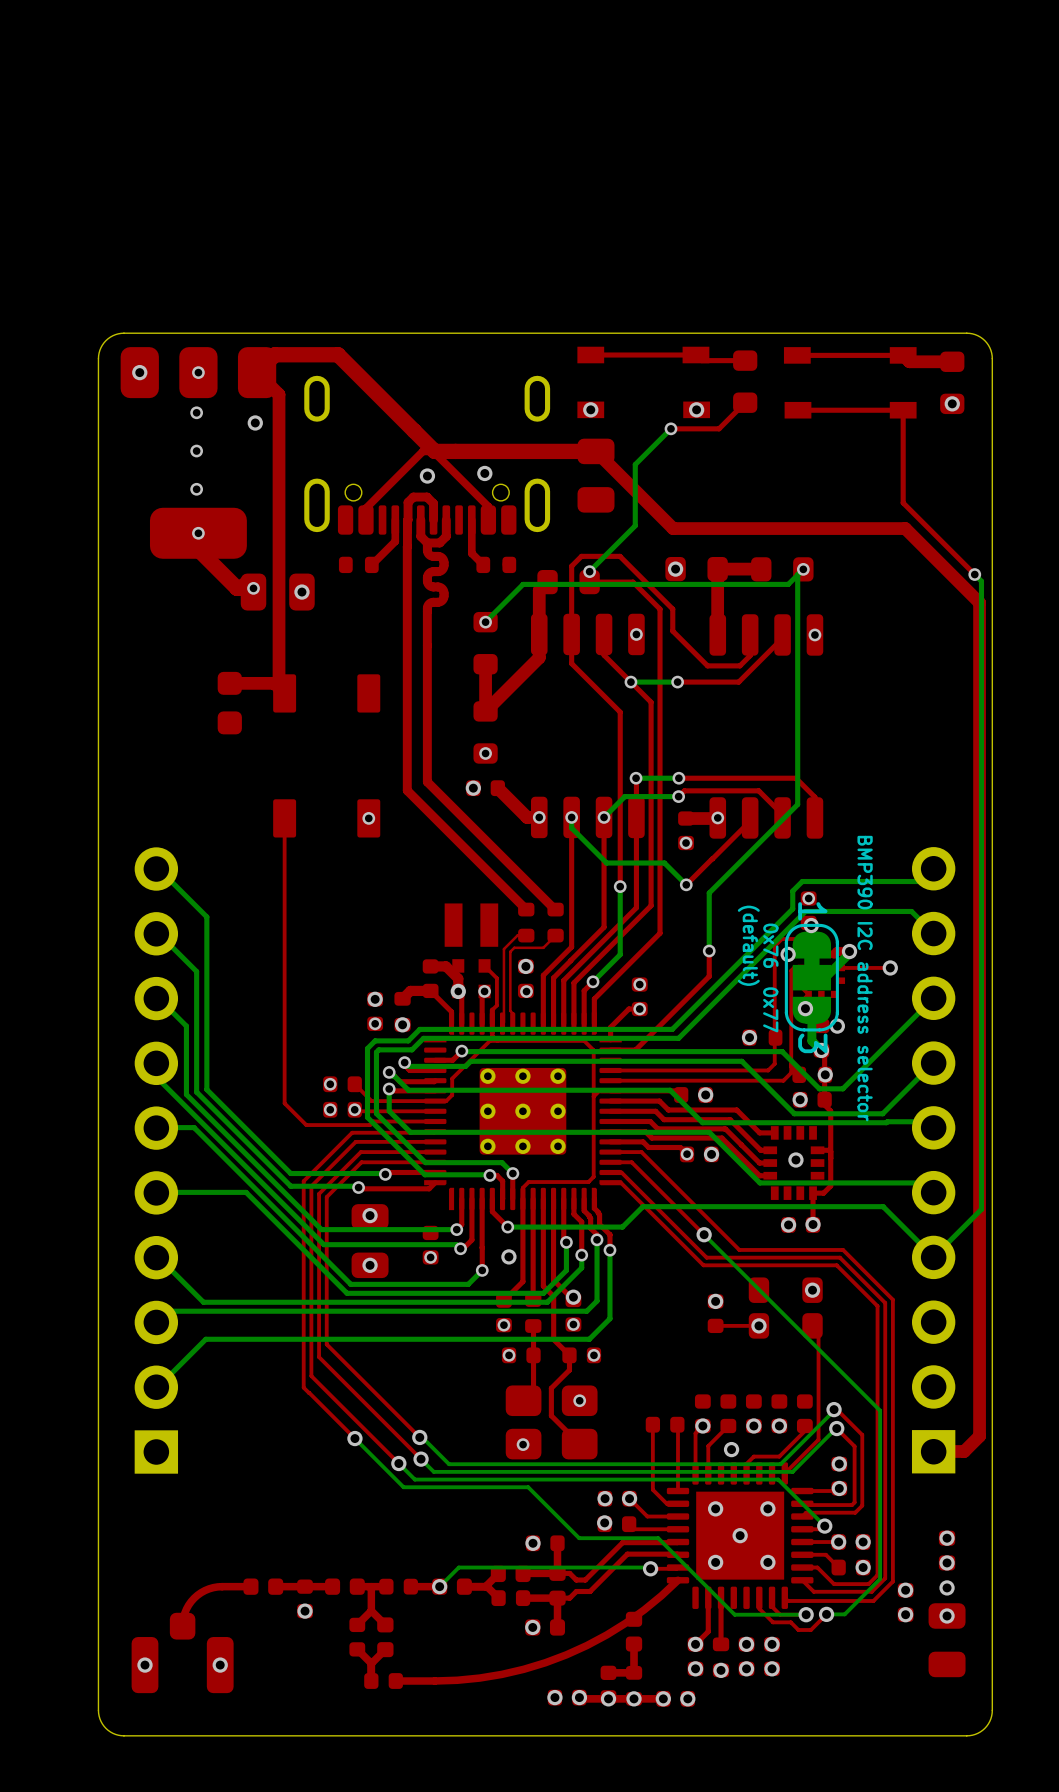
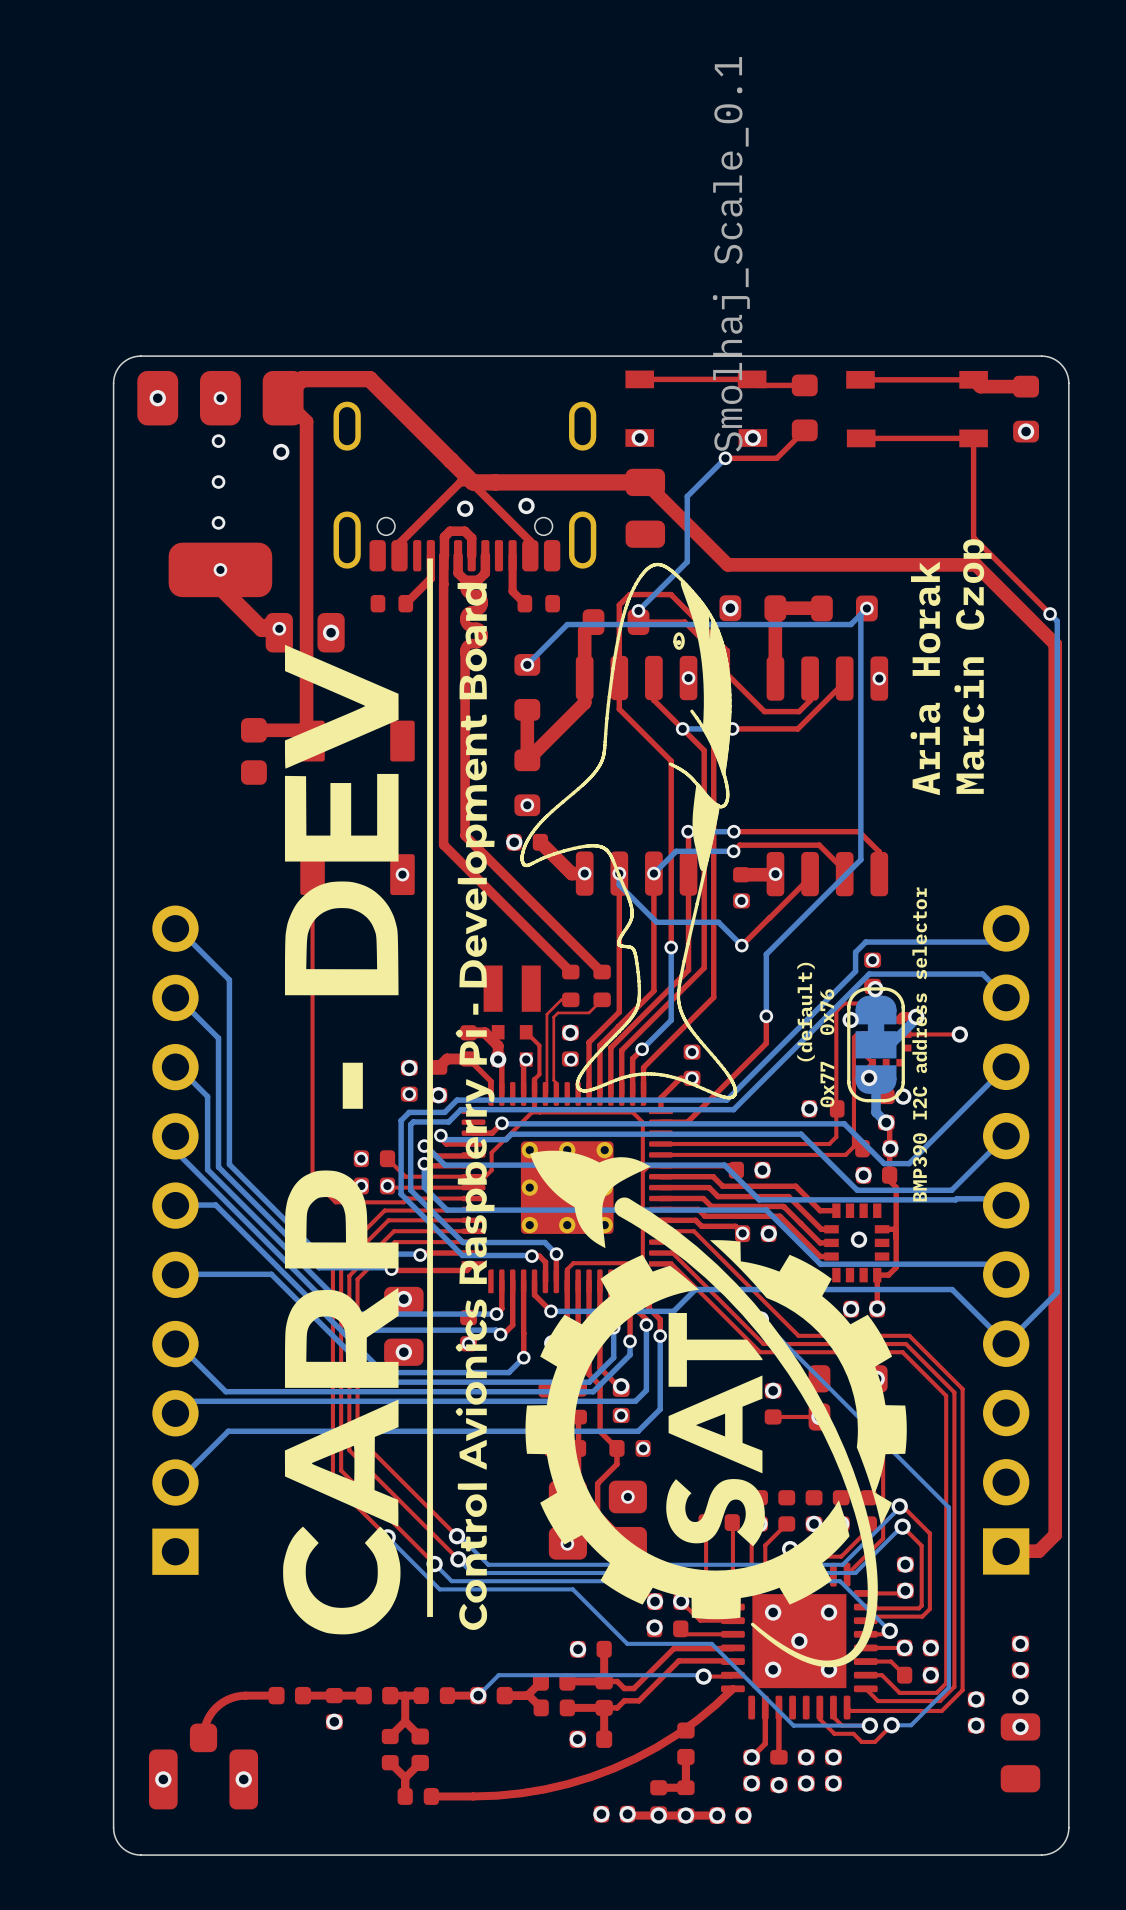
drawing: none -> [283, 558, 738, 1635]
text: none -> Marcin Czop (972, 666)
text: none -> Aria Horak (925, 678)
part text: 1 (812, 911) -> none
text rotation: 0° (748, 945) -> 180° (806, 1012)
text rotation: 0° (770, 945) -> 180° (827, 1012)
text rotation: 0° (865, 978) -> 180° (919, 1044)
drawing: none -> [342, 1062, 363, 1109]
text rotation: 0° (770, 1009) -> 180° (827, 1084)
part text: 3 (812, 1043) -> none
drawing: none -> [525, 1150, 907, 1668]

